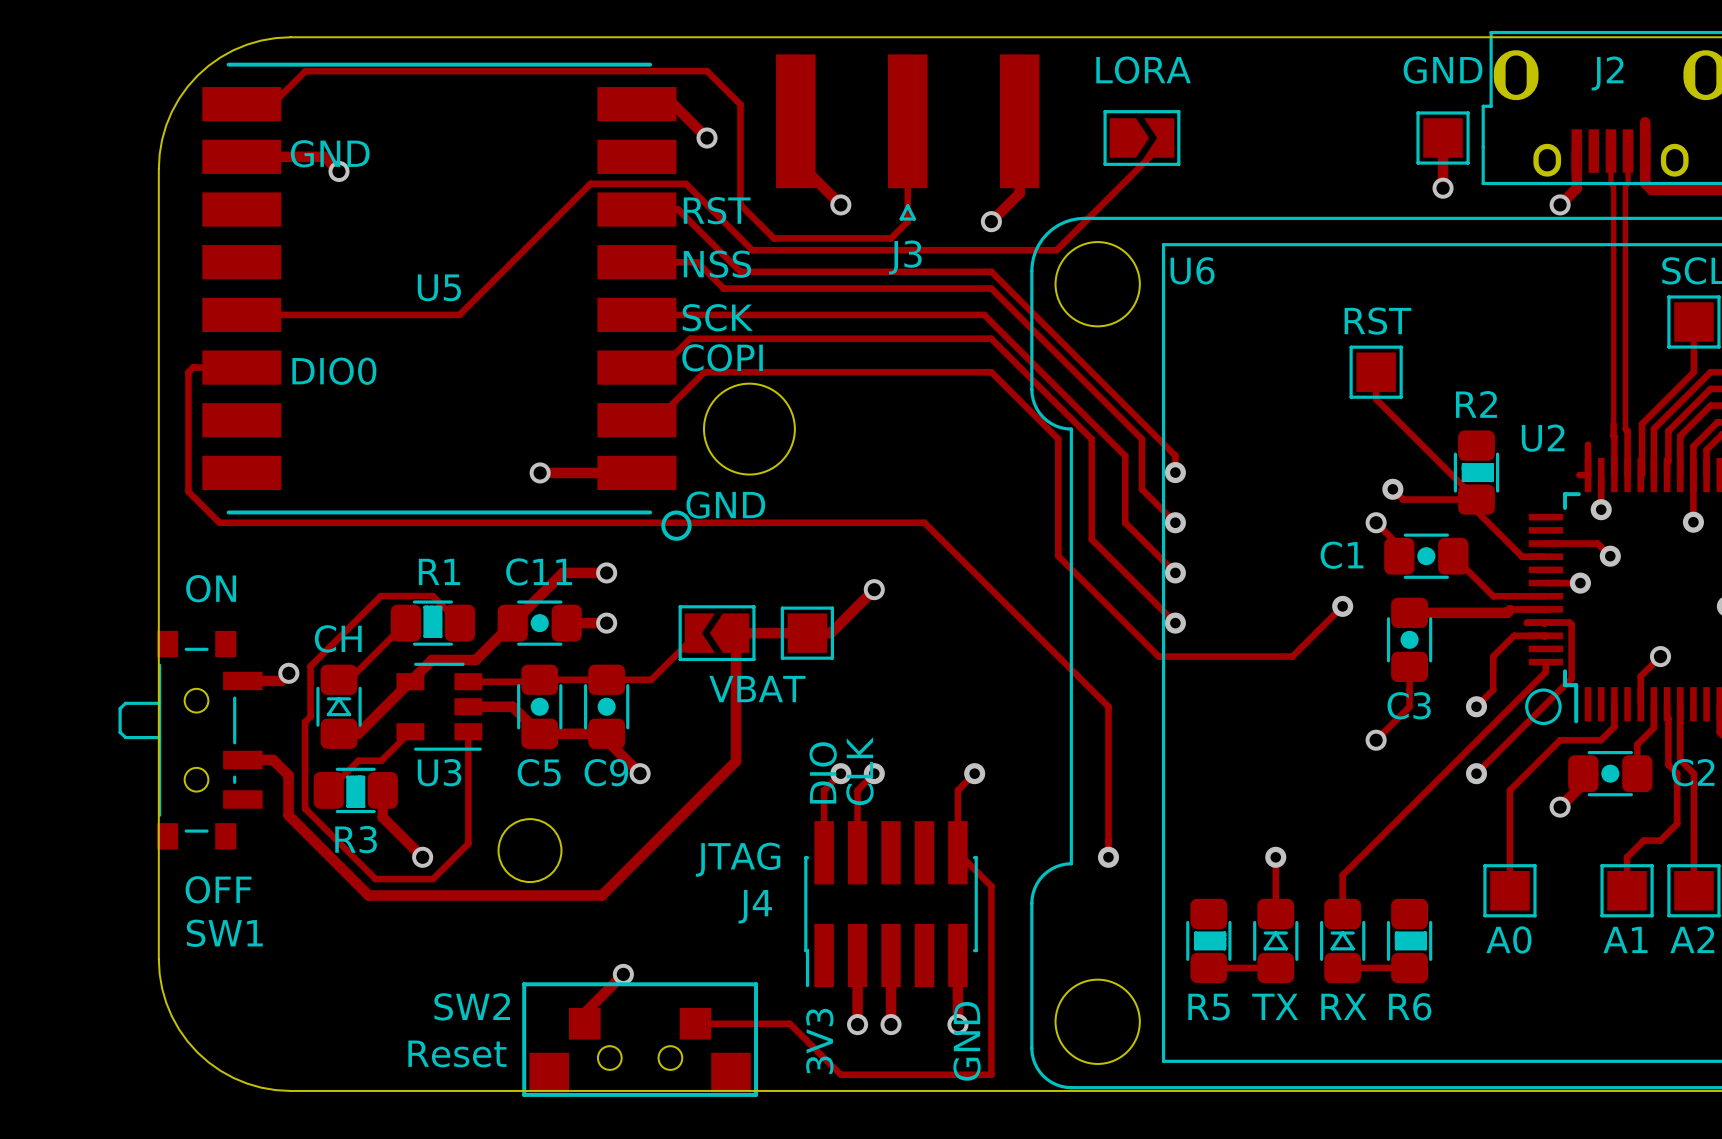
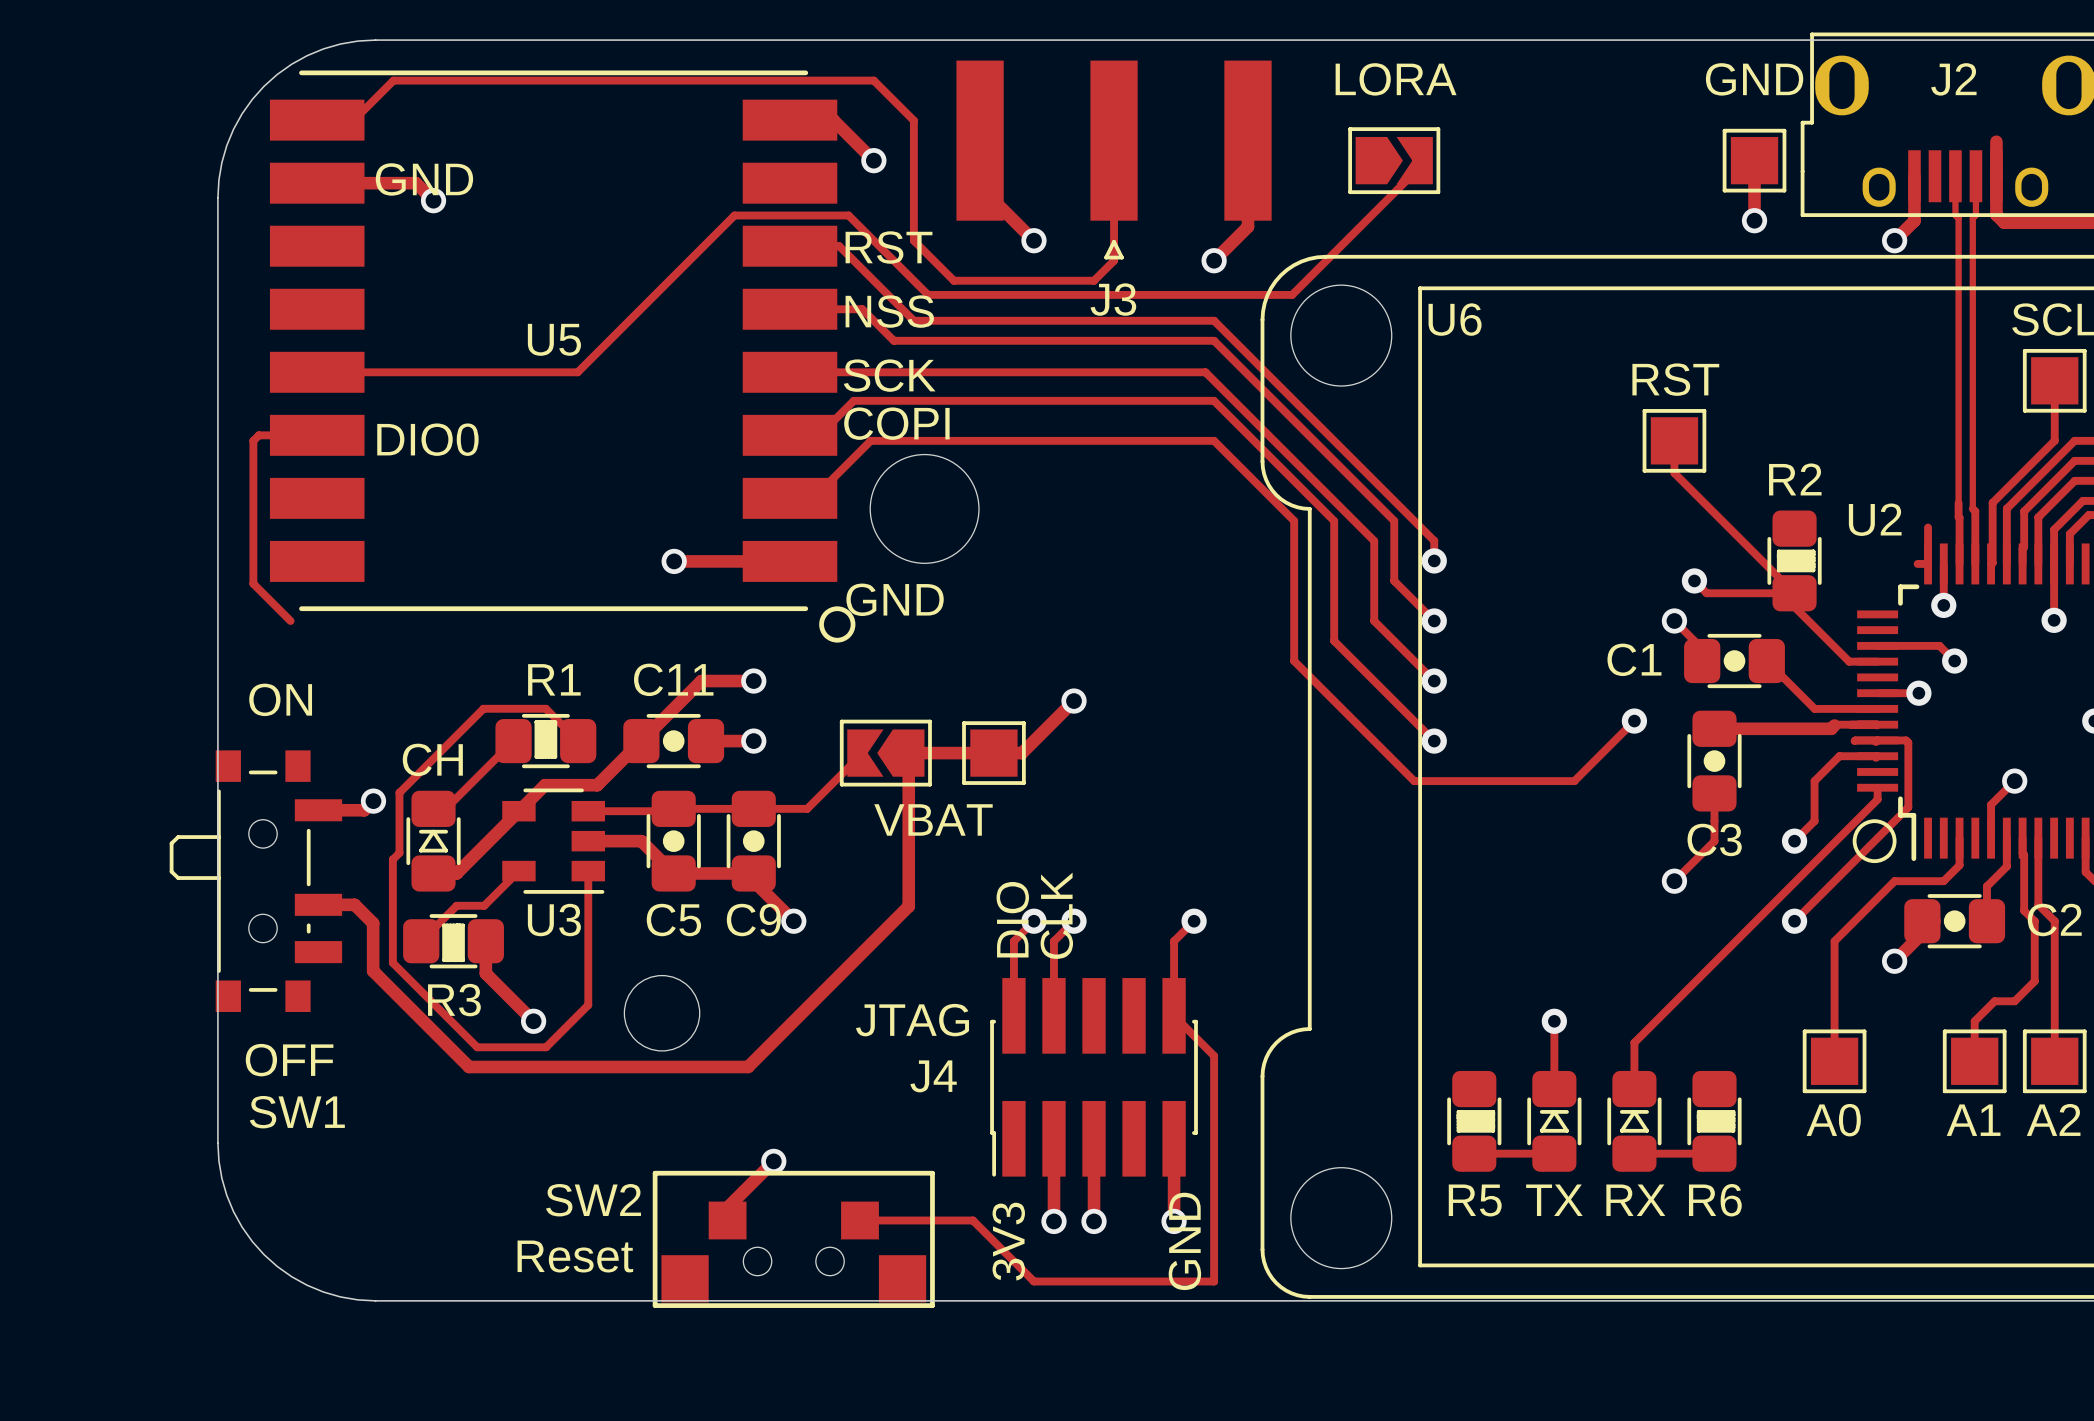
track: (219, 522) (924, 522) (1108, 706) (1108, 857) -> none
via: (1108, 857) -> none

